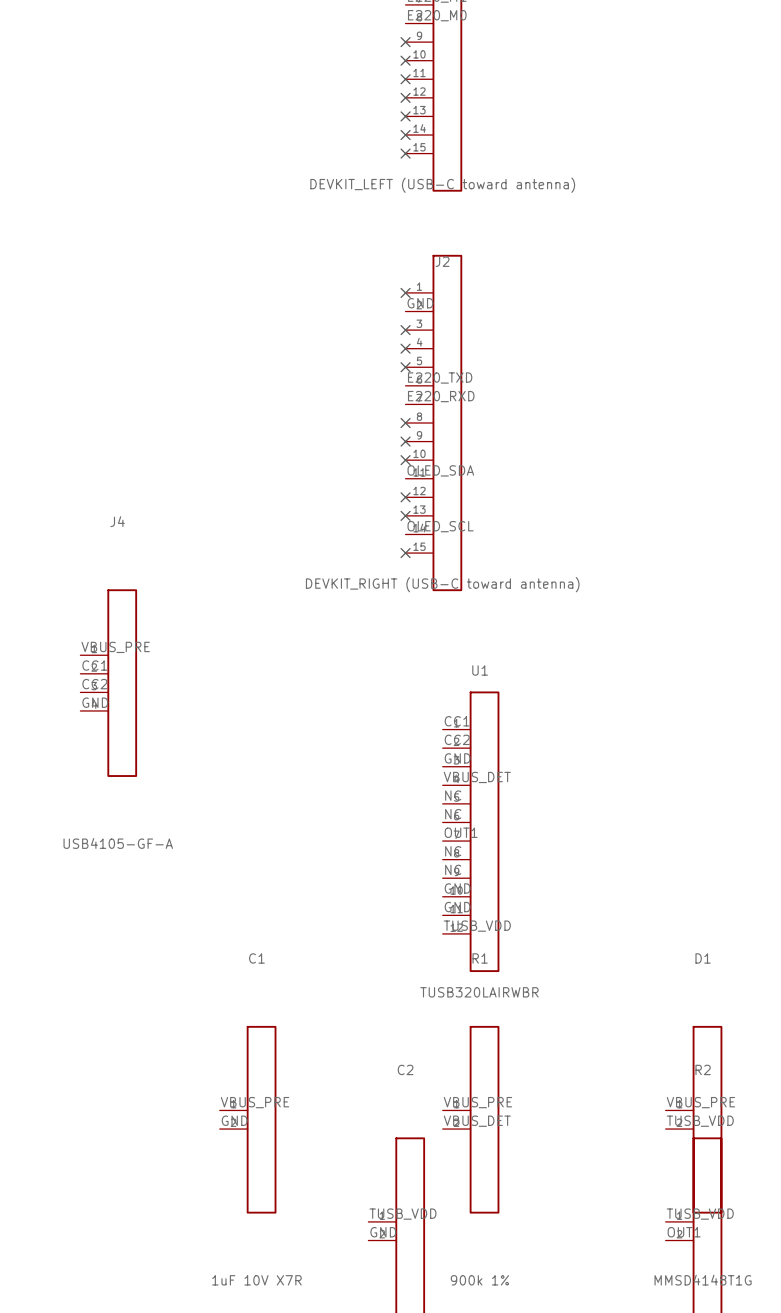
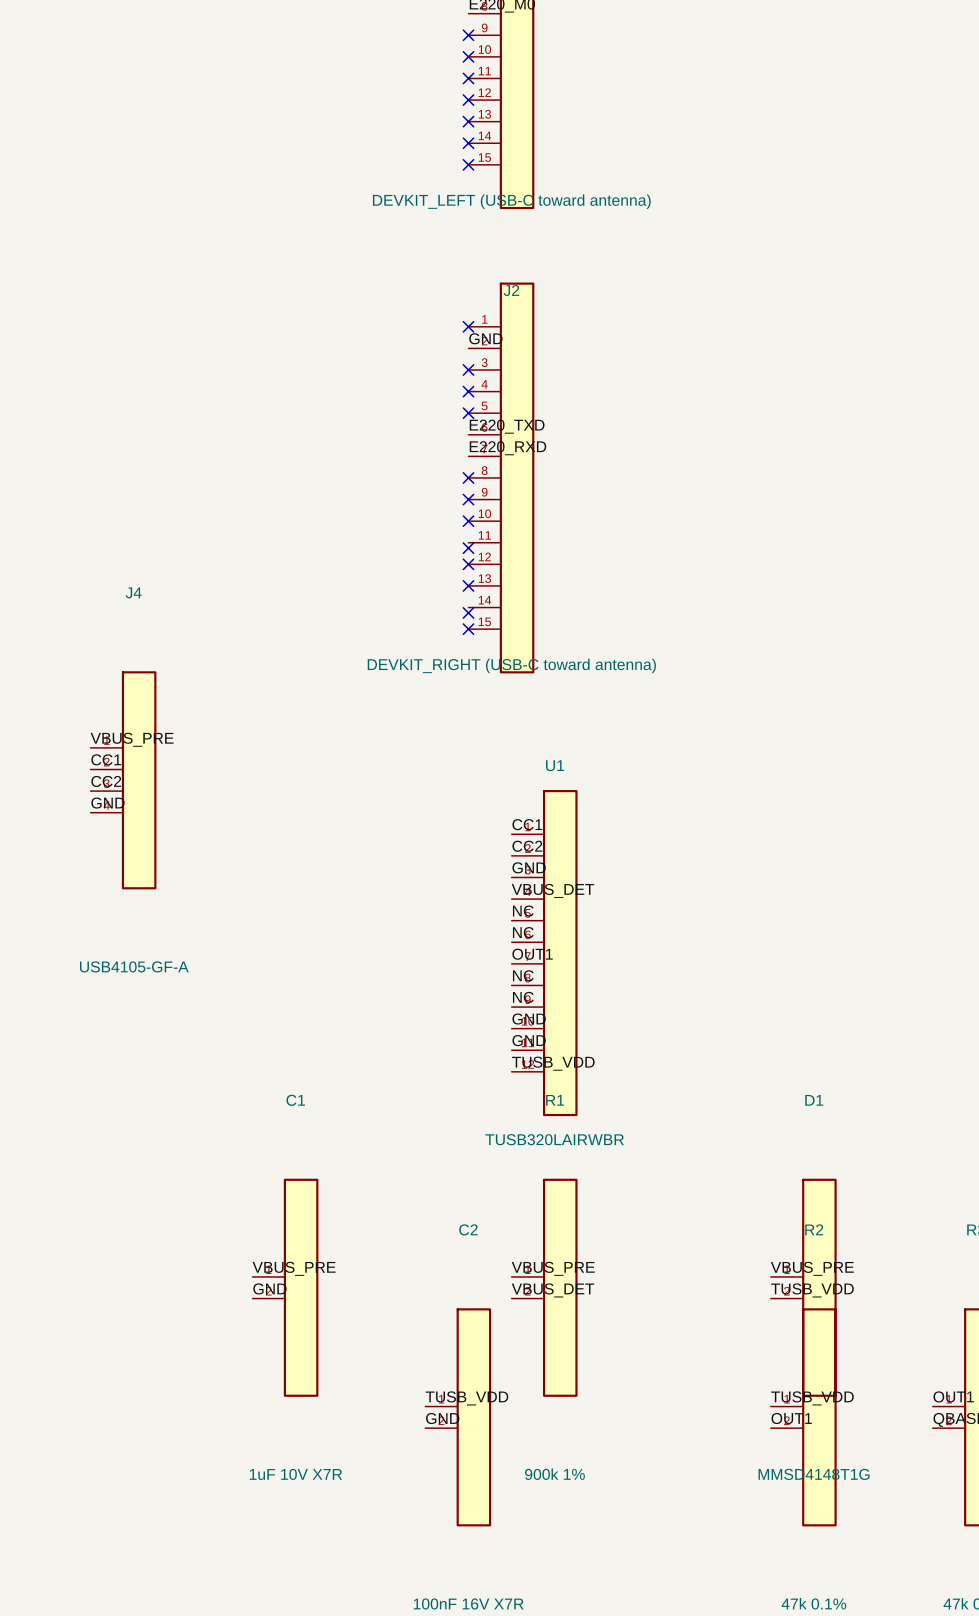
label: OLED_SDA (440, 470) -> none
no-connect mark: none -> (468, 548)
label: OLED_SCL (440, 526) -> none
no-connect mark: none -> (468, 612)

